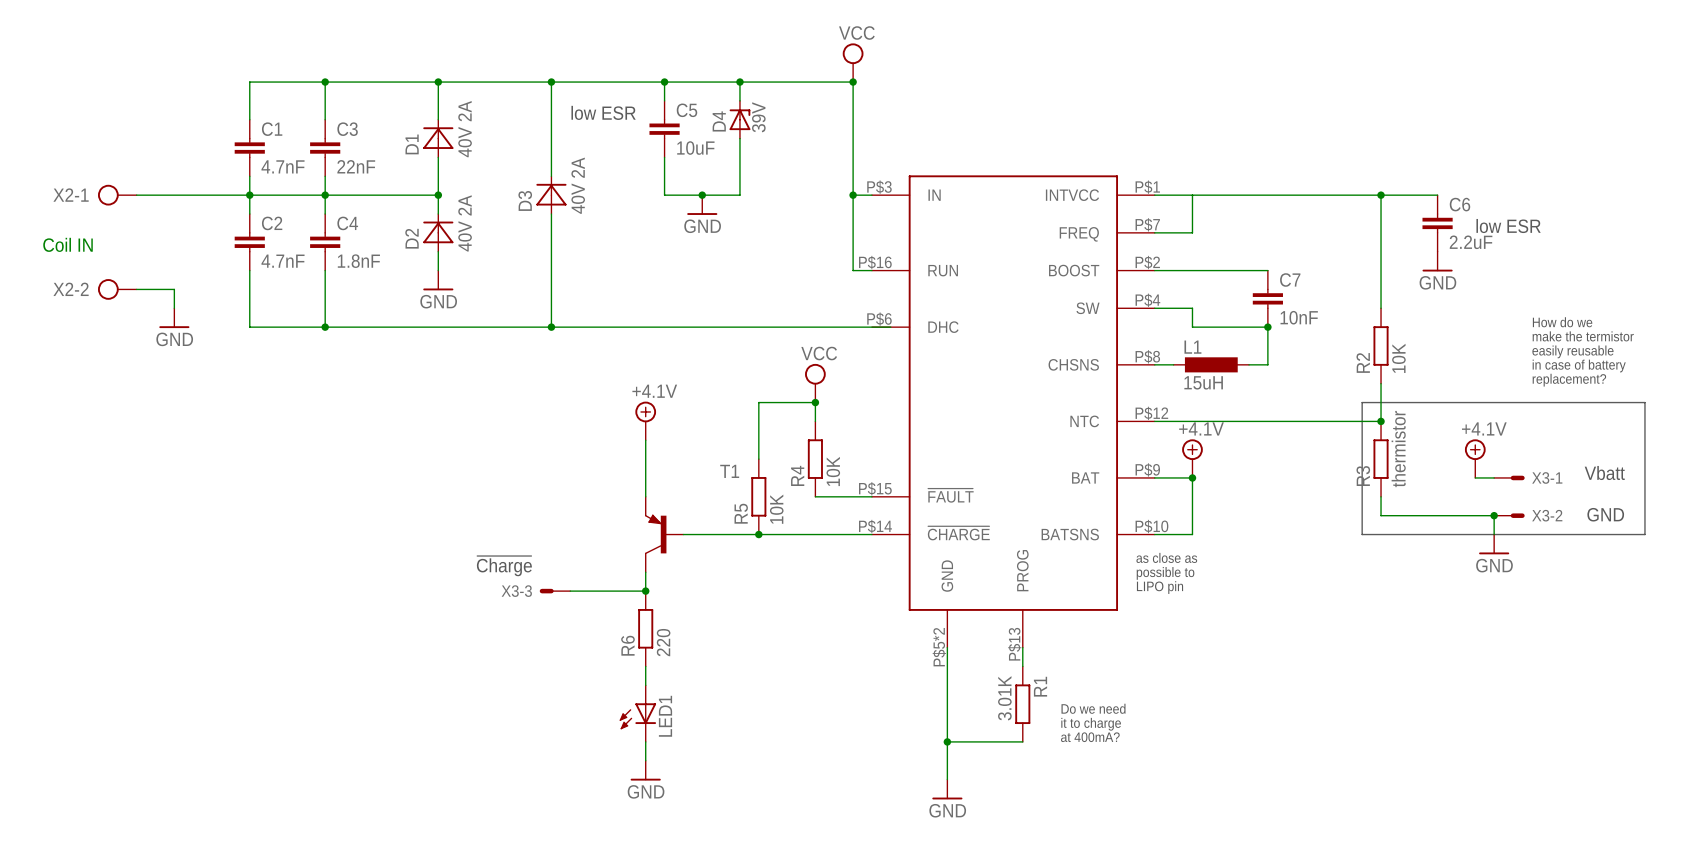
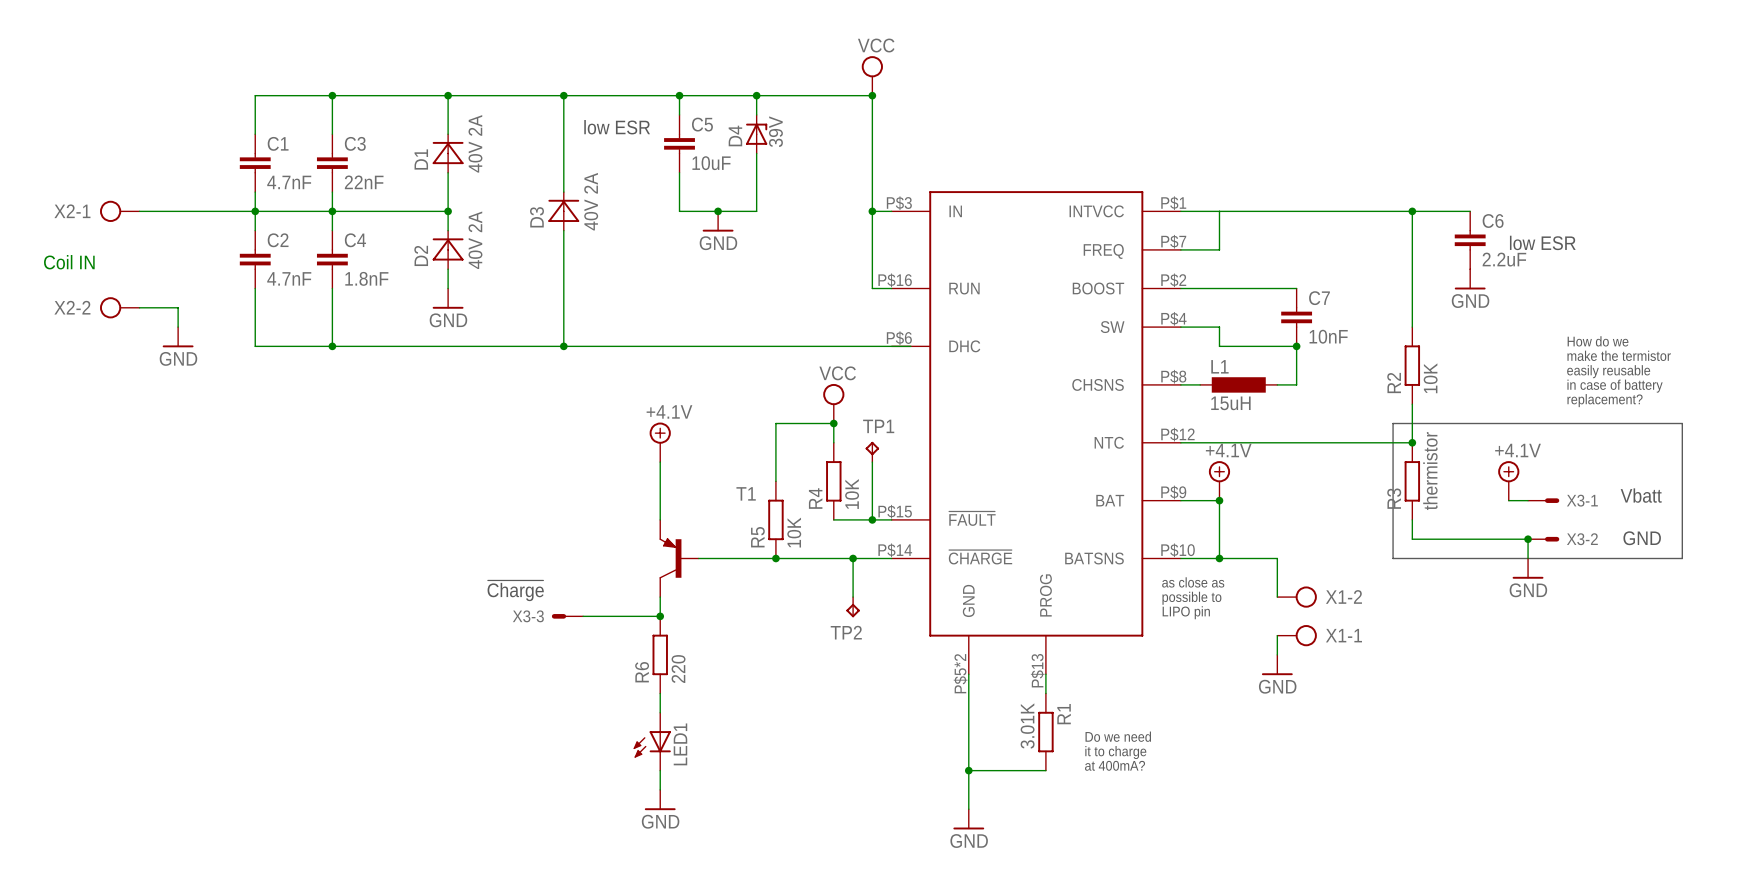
TP1: none -> (872, 451)
wire: none -> (872, 462) (872, 519)
junction: none -> (872, 519)
wire: none -> (853, 558) (853, 597)
junction: none -> (853, 558)
wire: none -> (1219, 558) (1277, 558) (1277, 597)
junction: none -> (1219, 558)
X1-2: none -> (1297, 597)
TP2: none -> (853, 607)
wire: none -> (1277, 635) (1277, 654)
X1-1: none -> (1297, 635)
power symbol: none -> GND (1277, 665)

